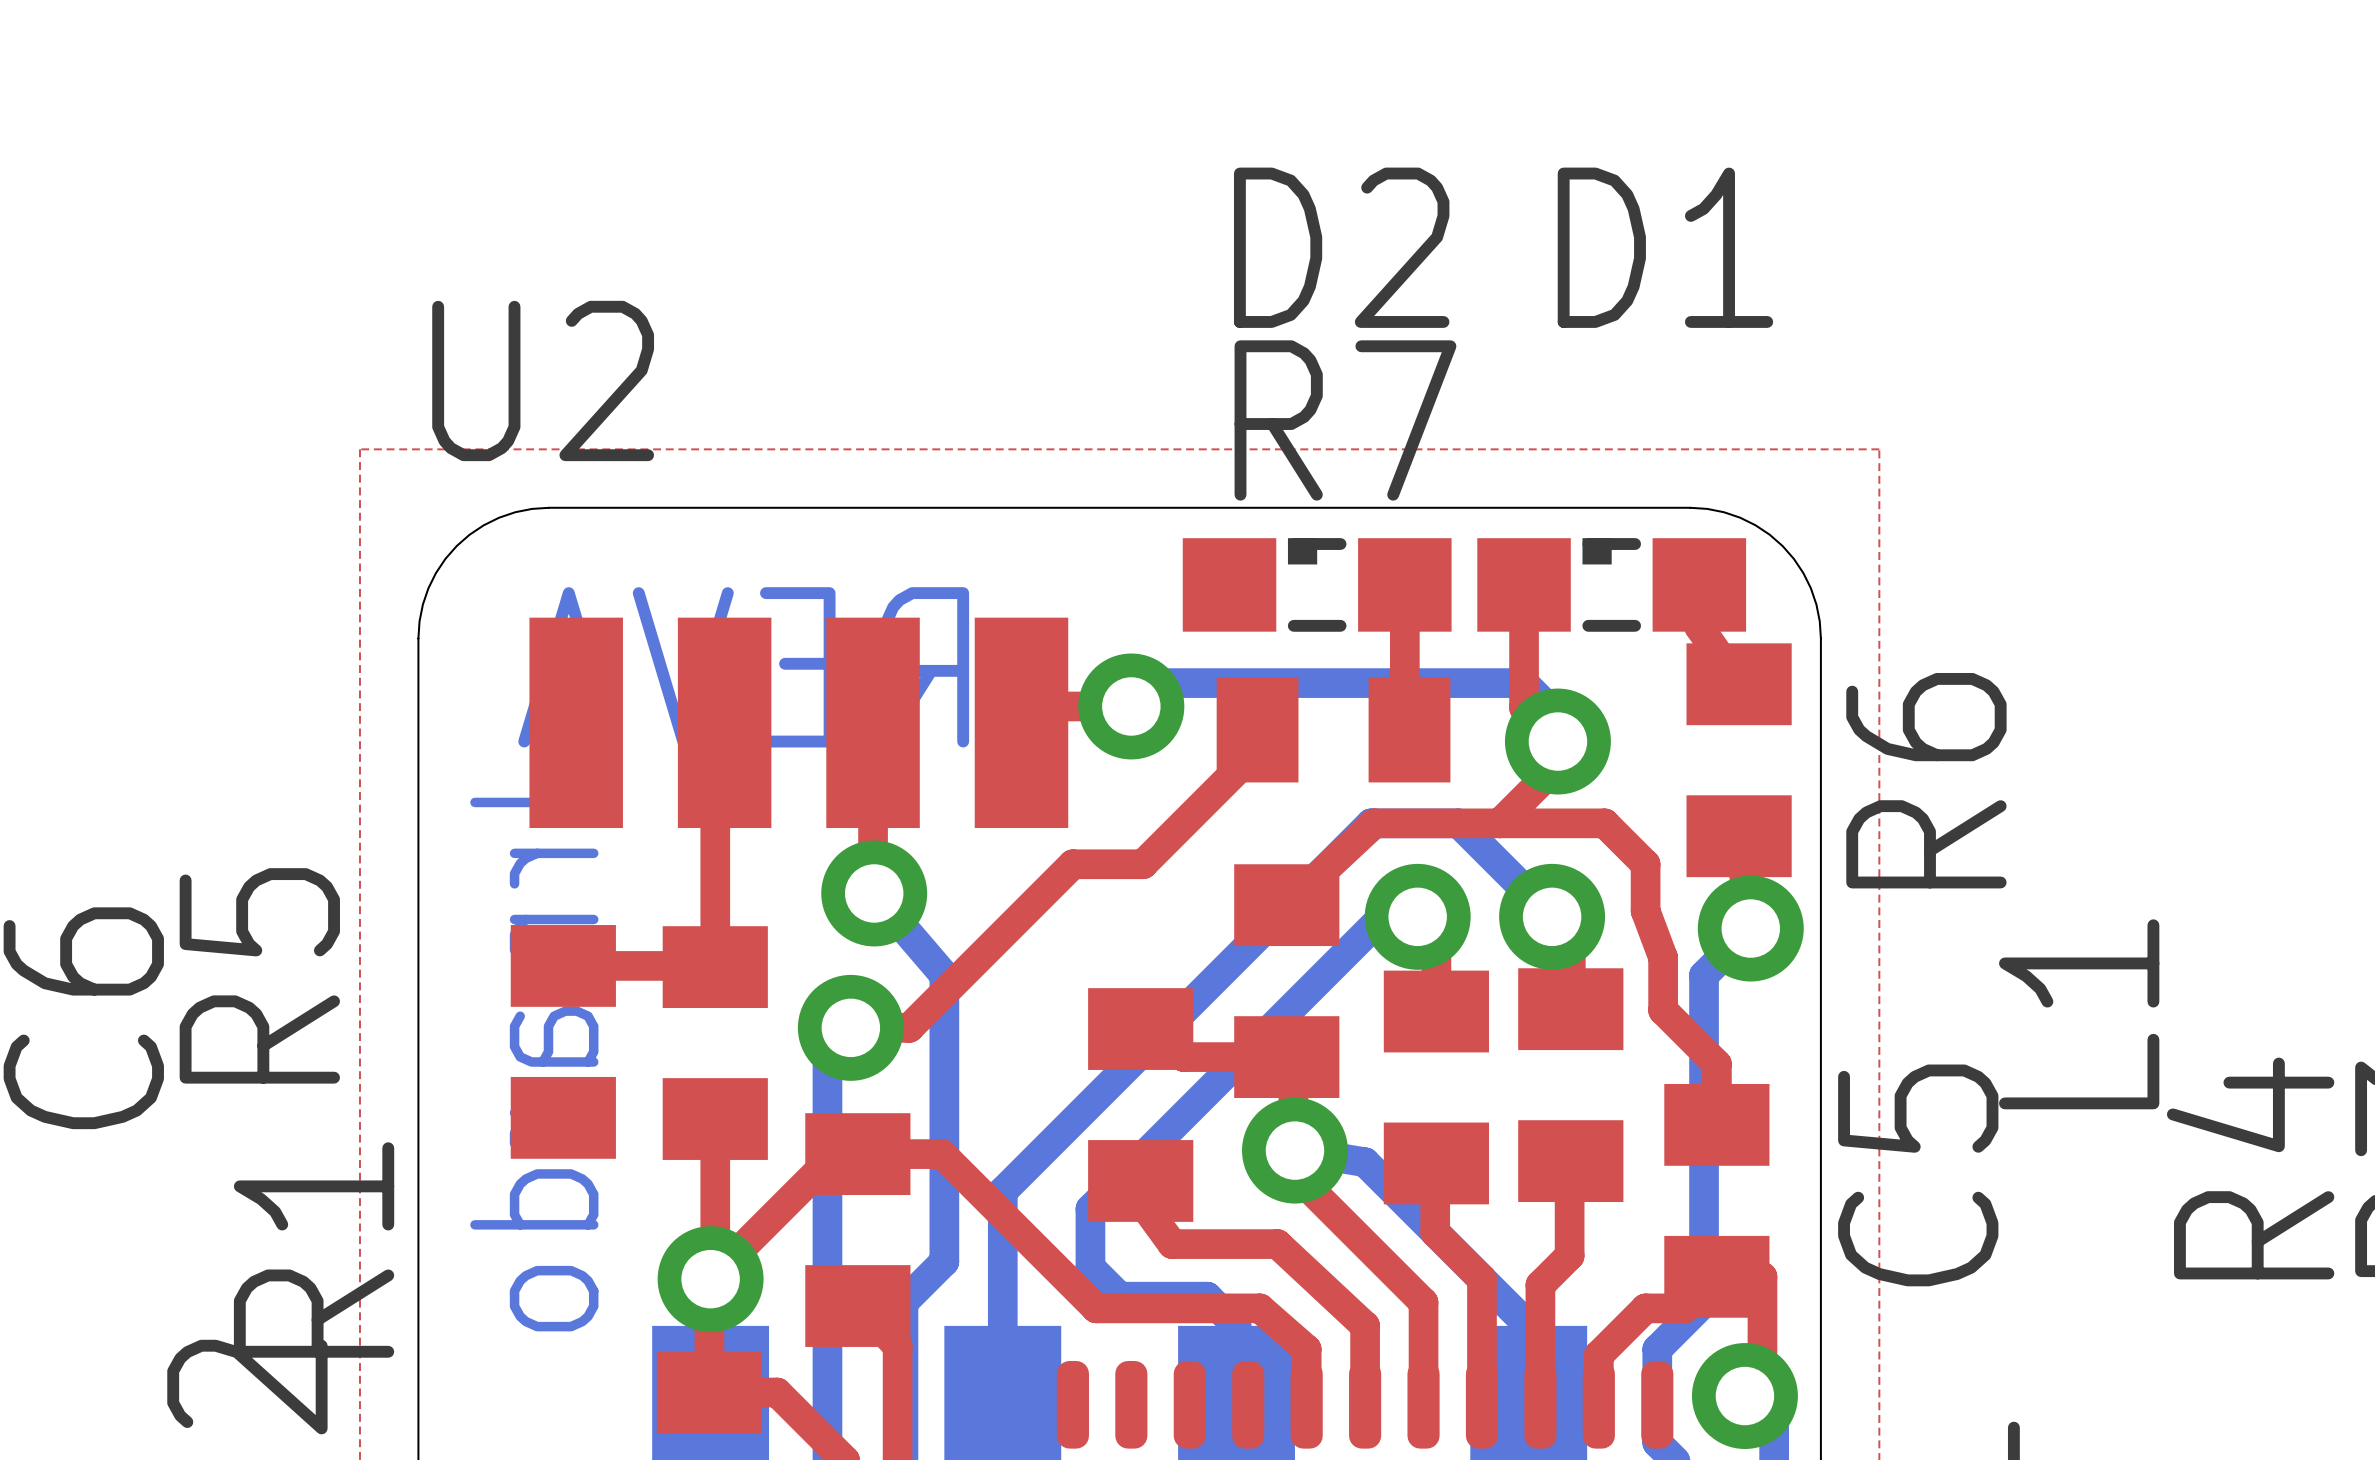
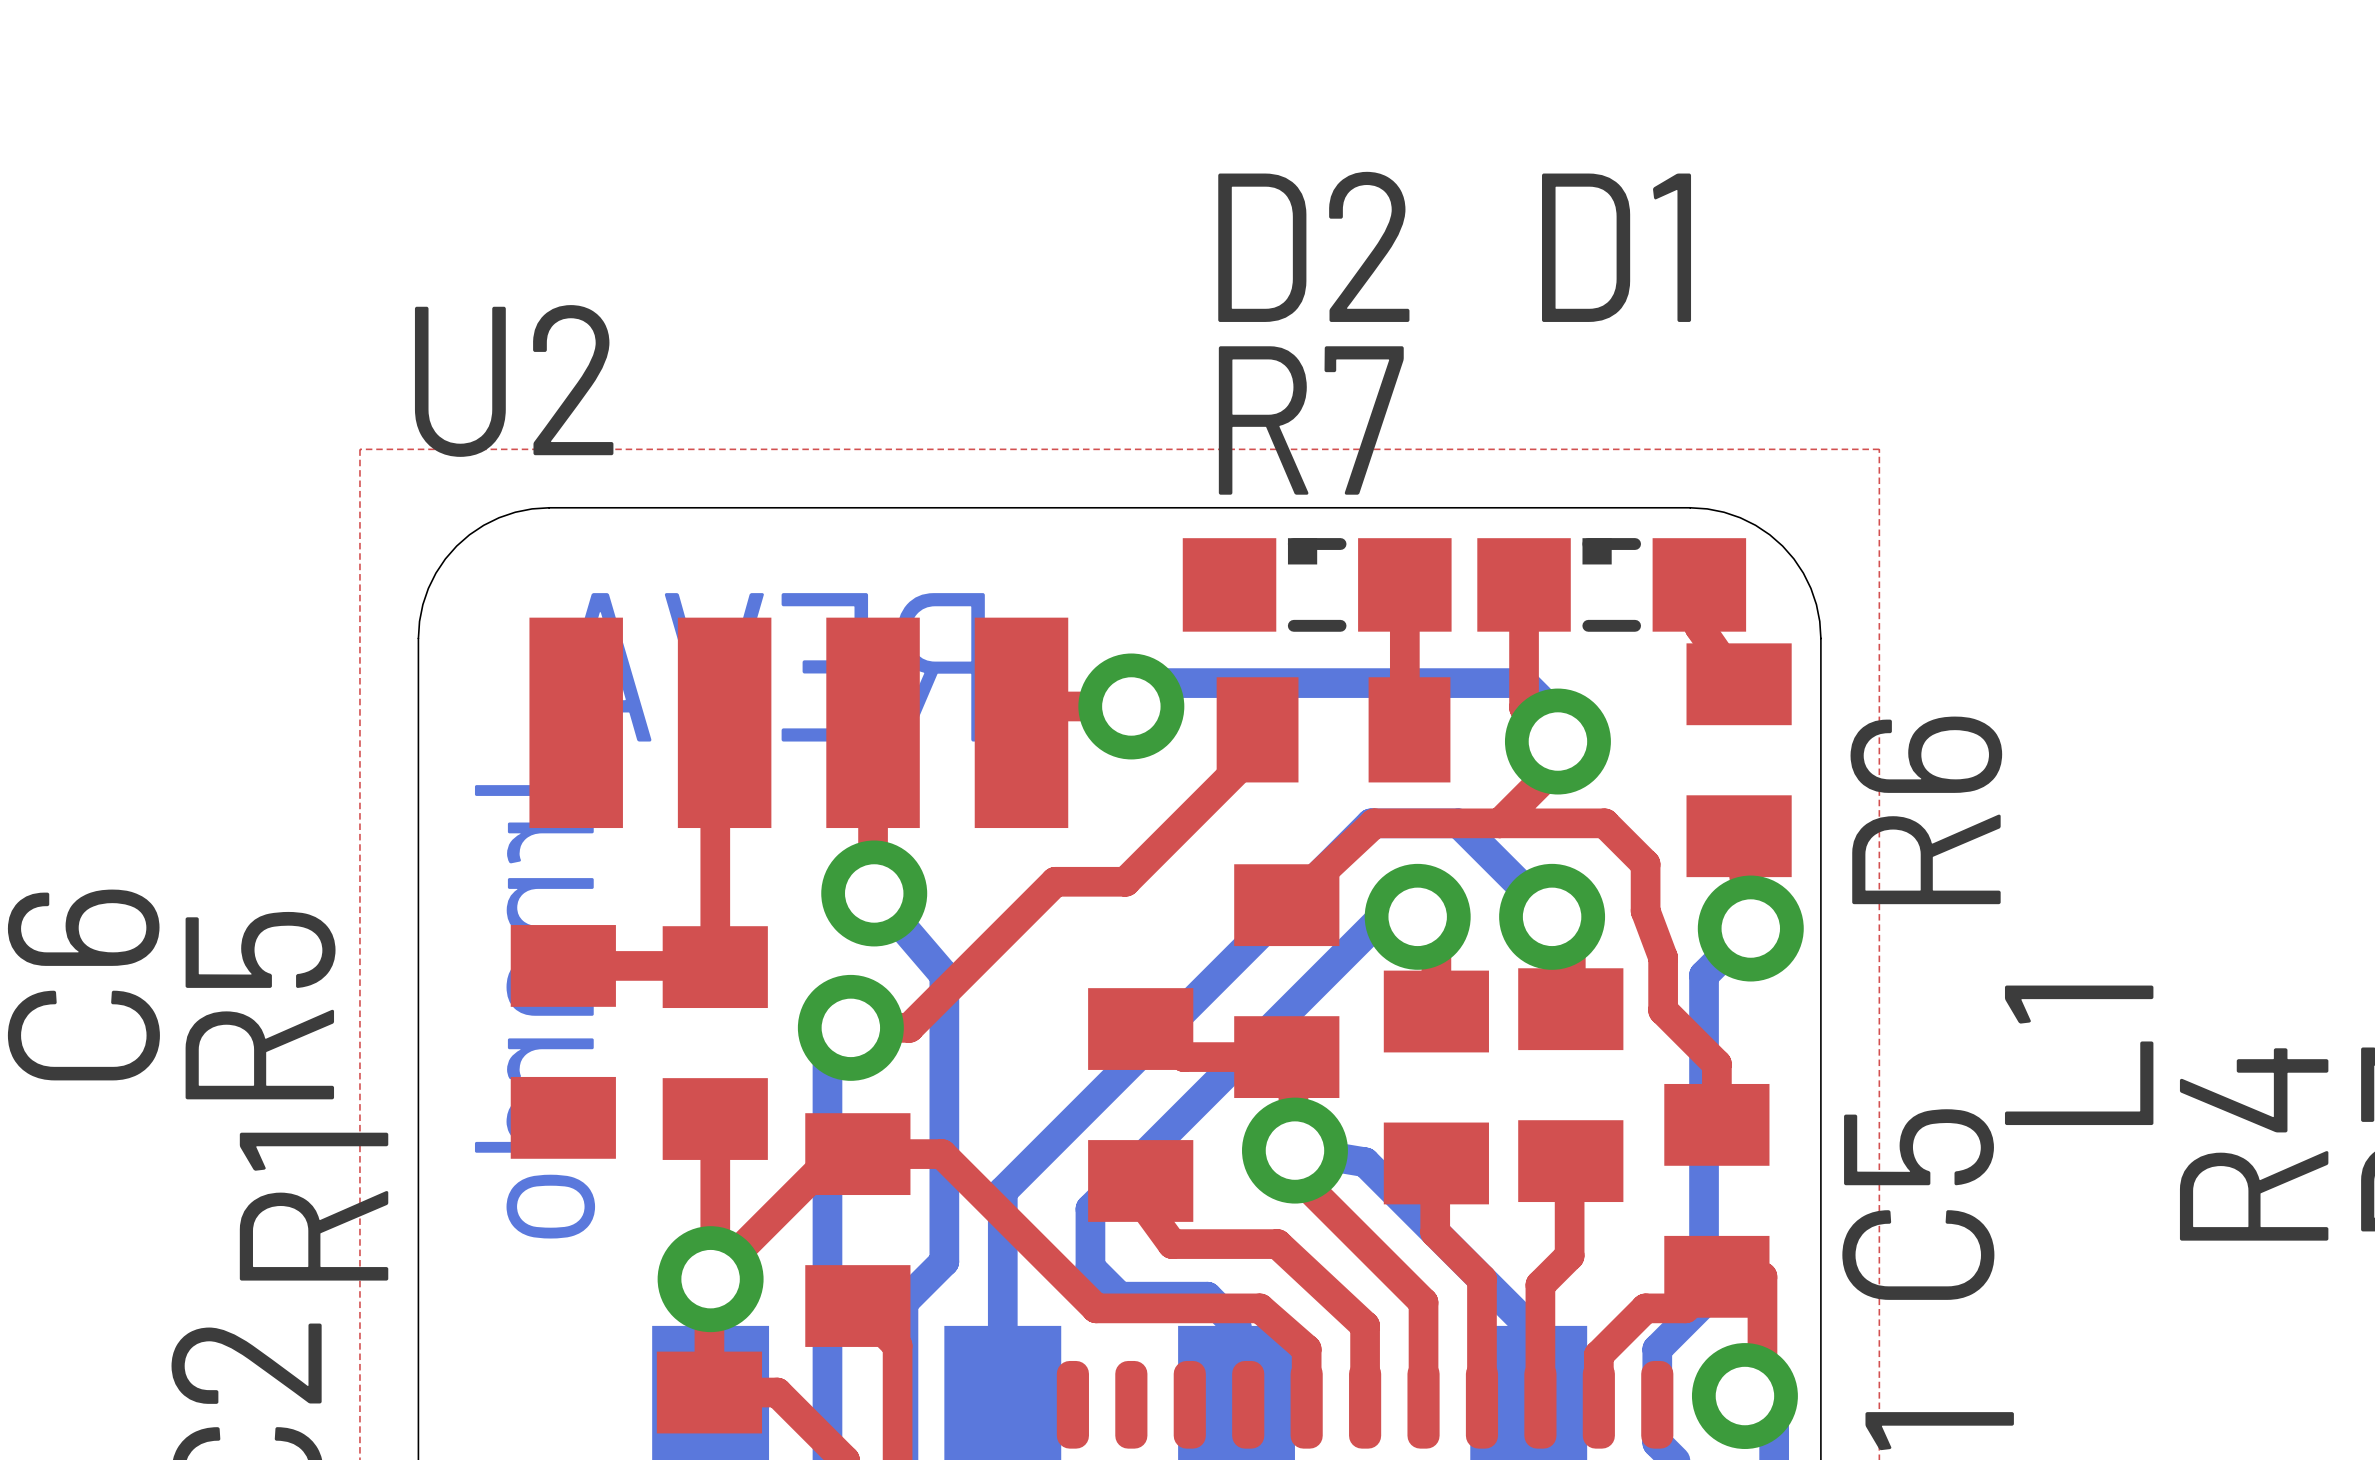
top track: (1143, 864) (1072, 864) (1055, 881) -> (1143, 864) (1125, 881) (1055, 881)

